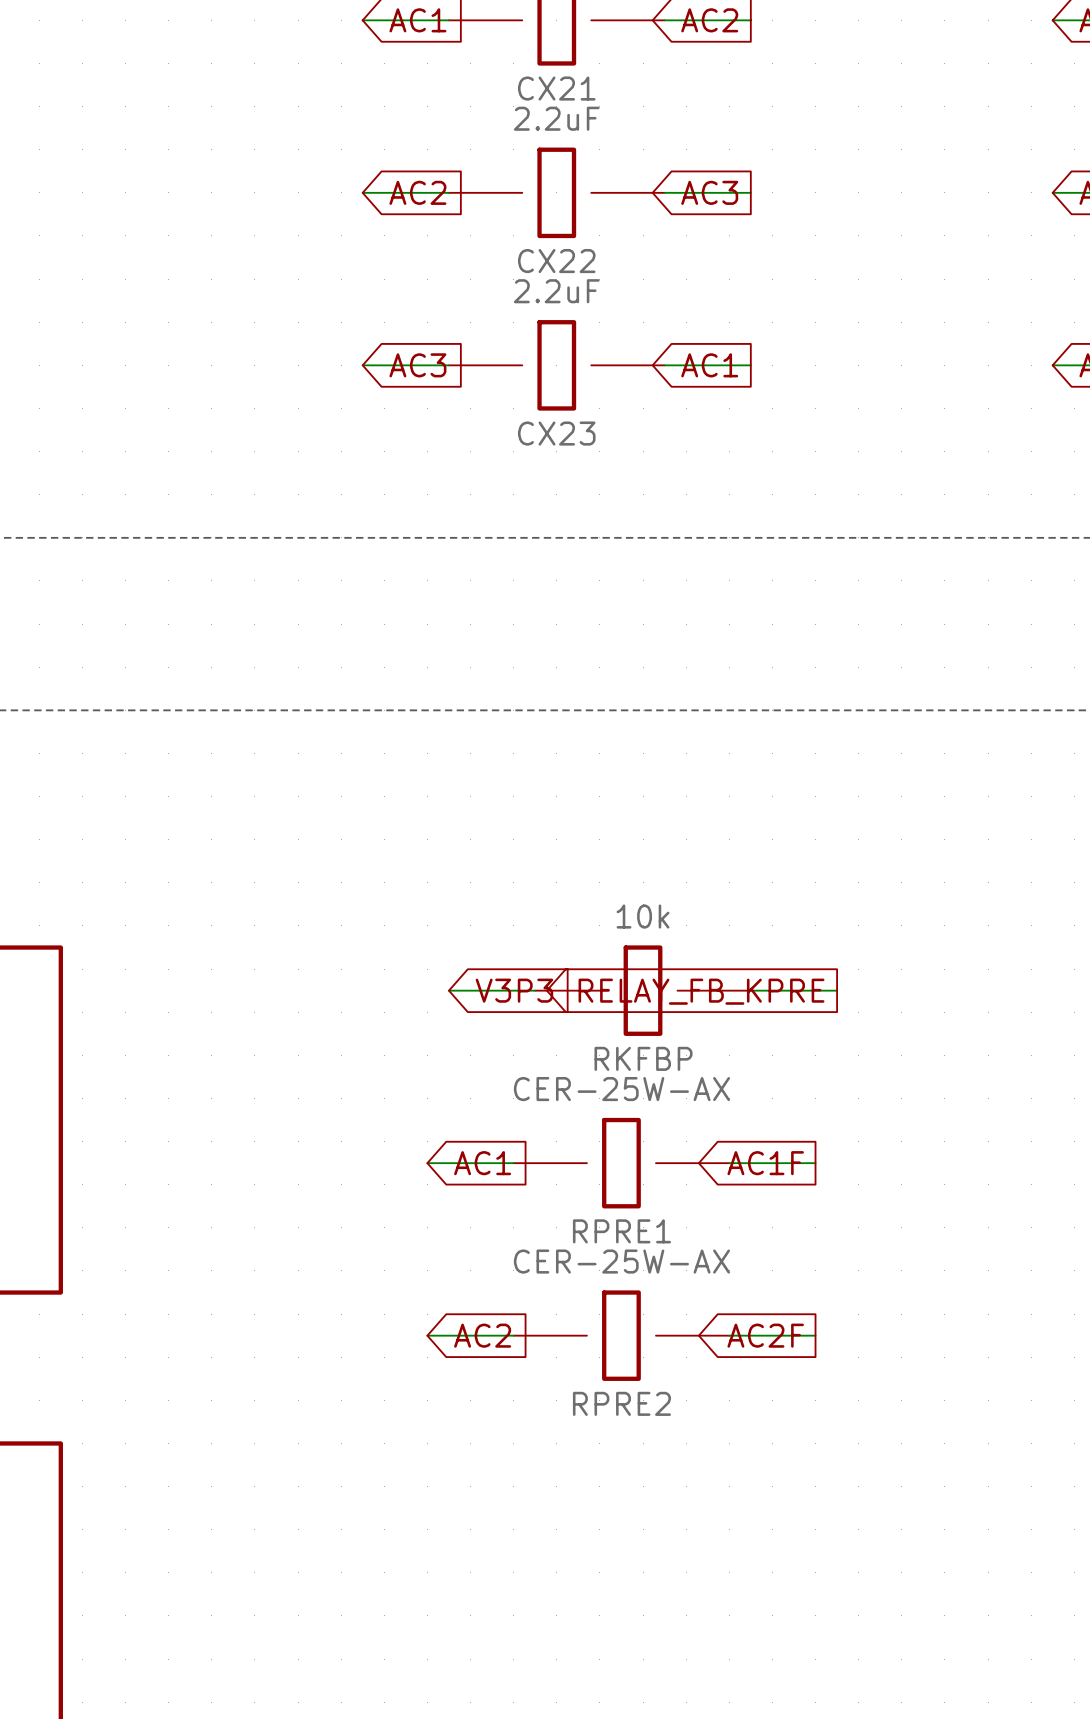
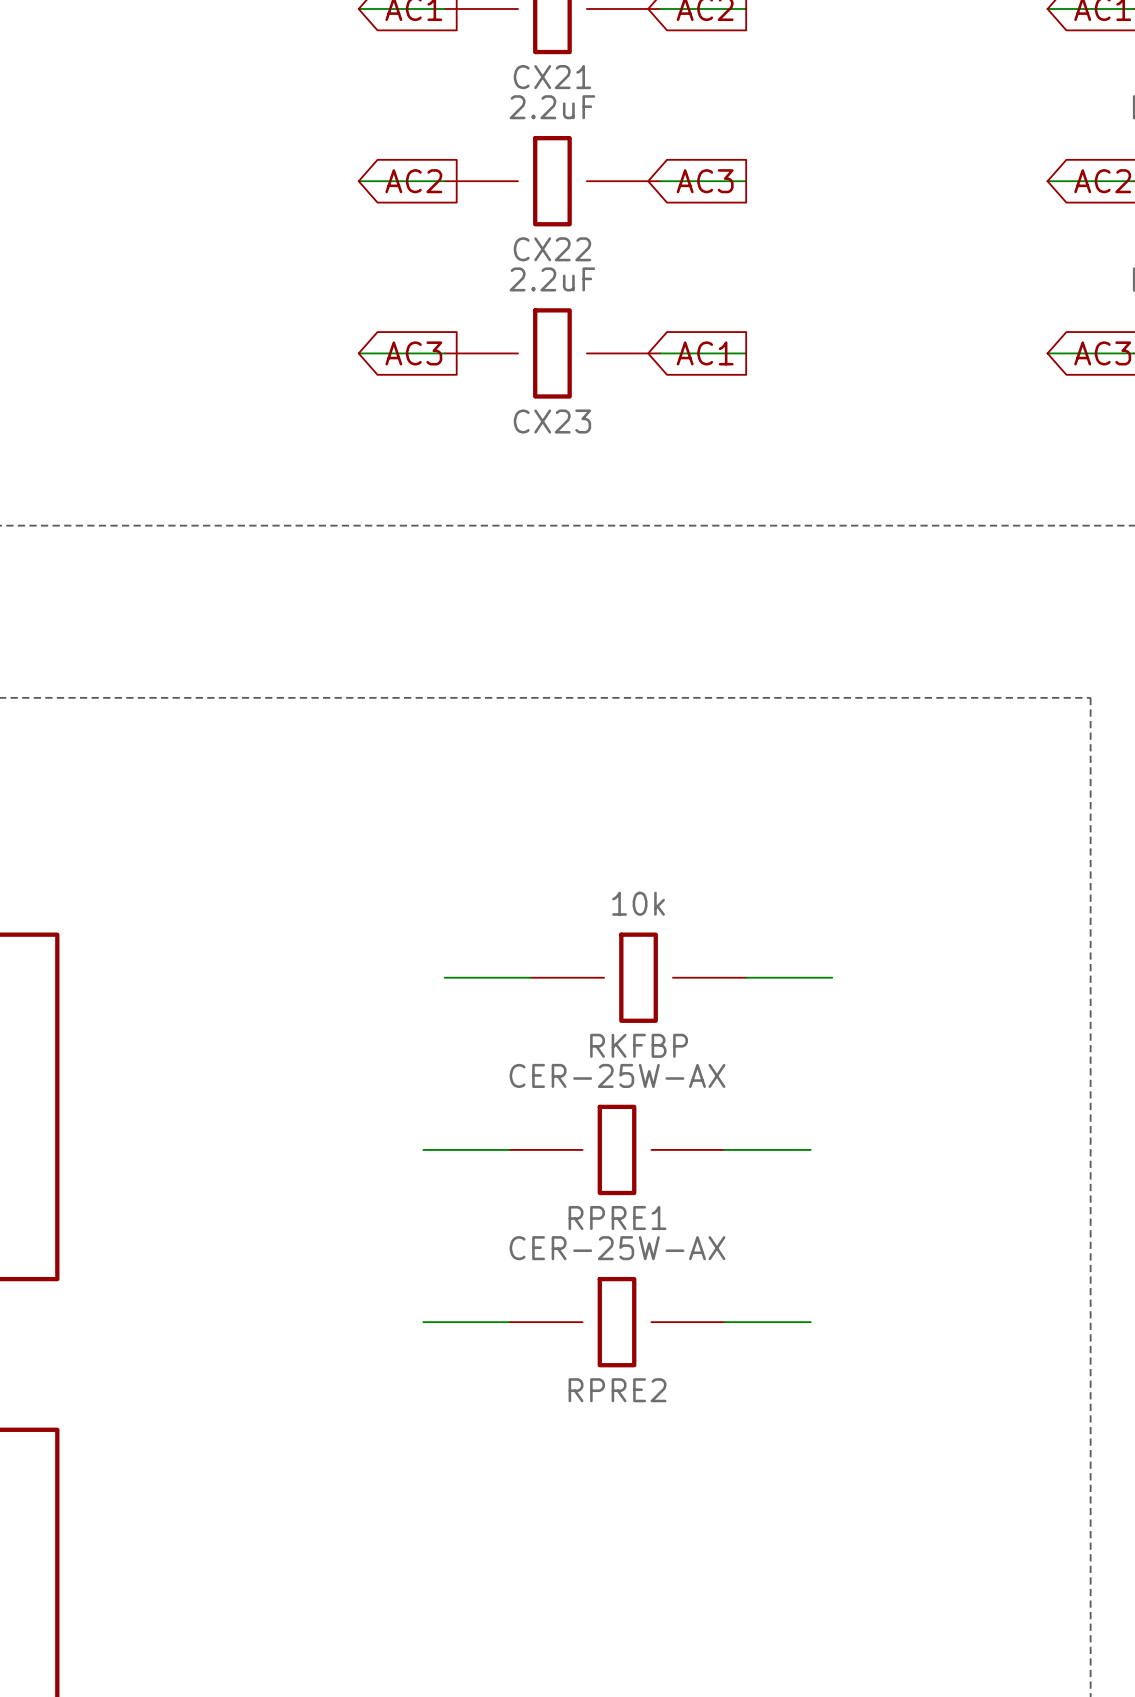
global label: V3P3 (514, 990) -> none
global label: RELAY_FB_KPRE (701, 991) -> none
global label: AC1 (482, 1163) -> none
global label: AC1F (765, 1163) -> none
global label: AC2 (482, 1335) -> none
global label: AC2F (765, 1335) -> none

